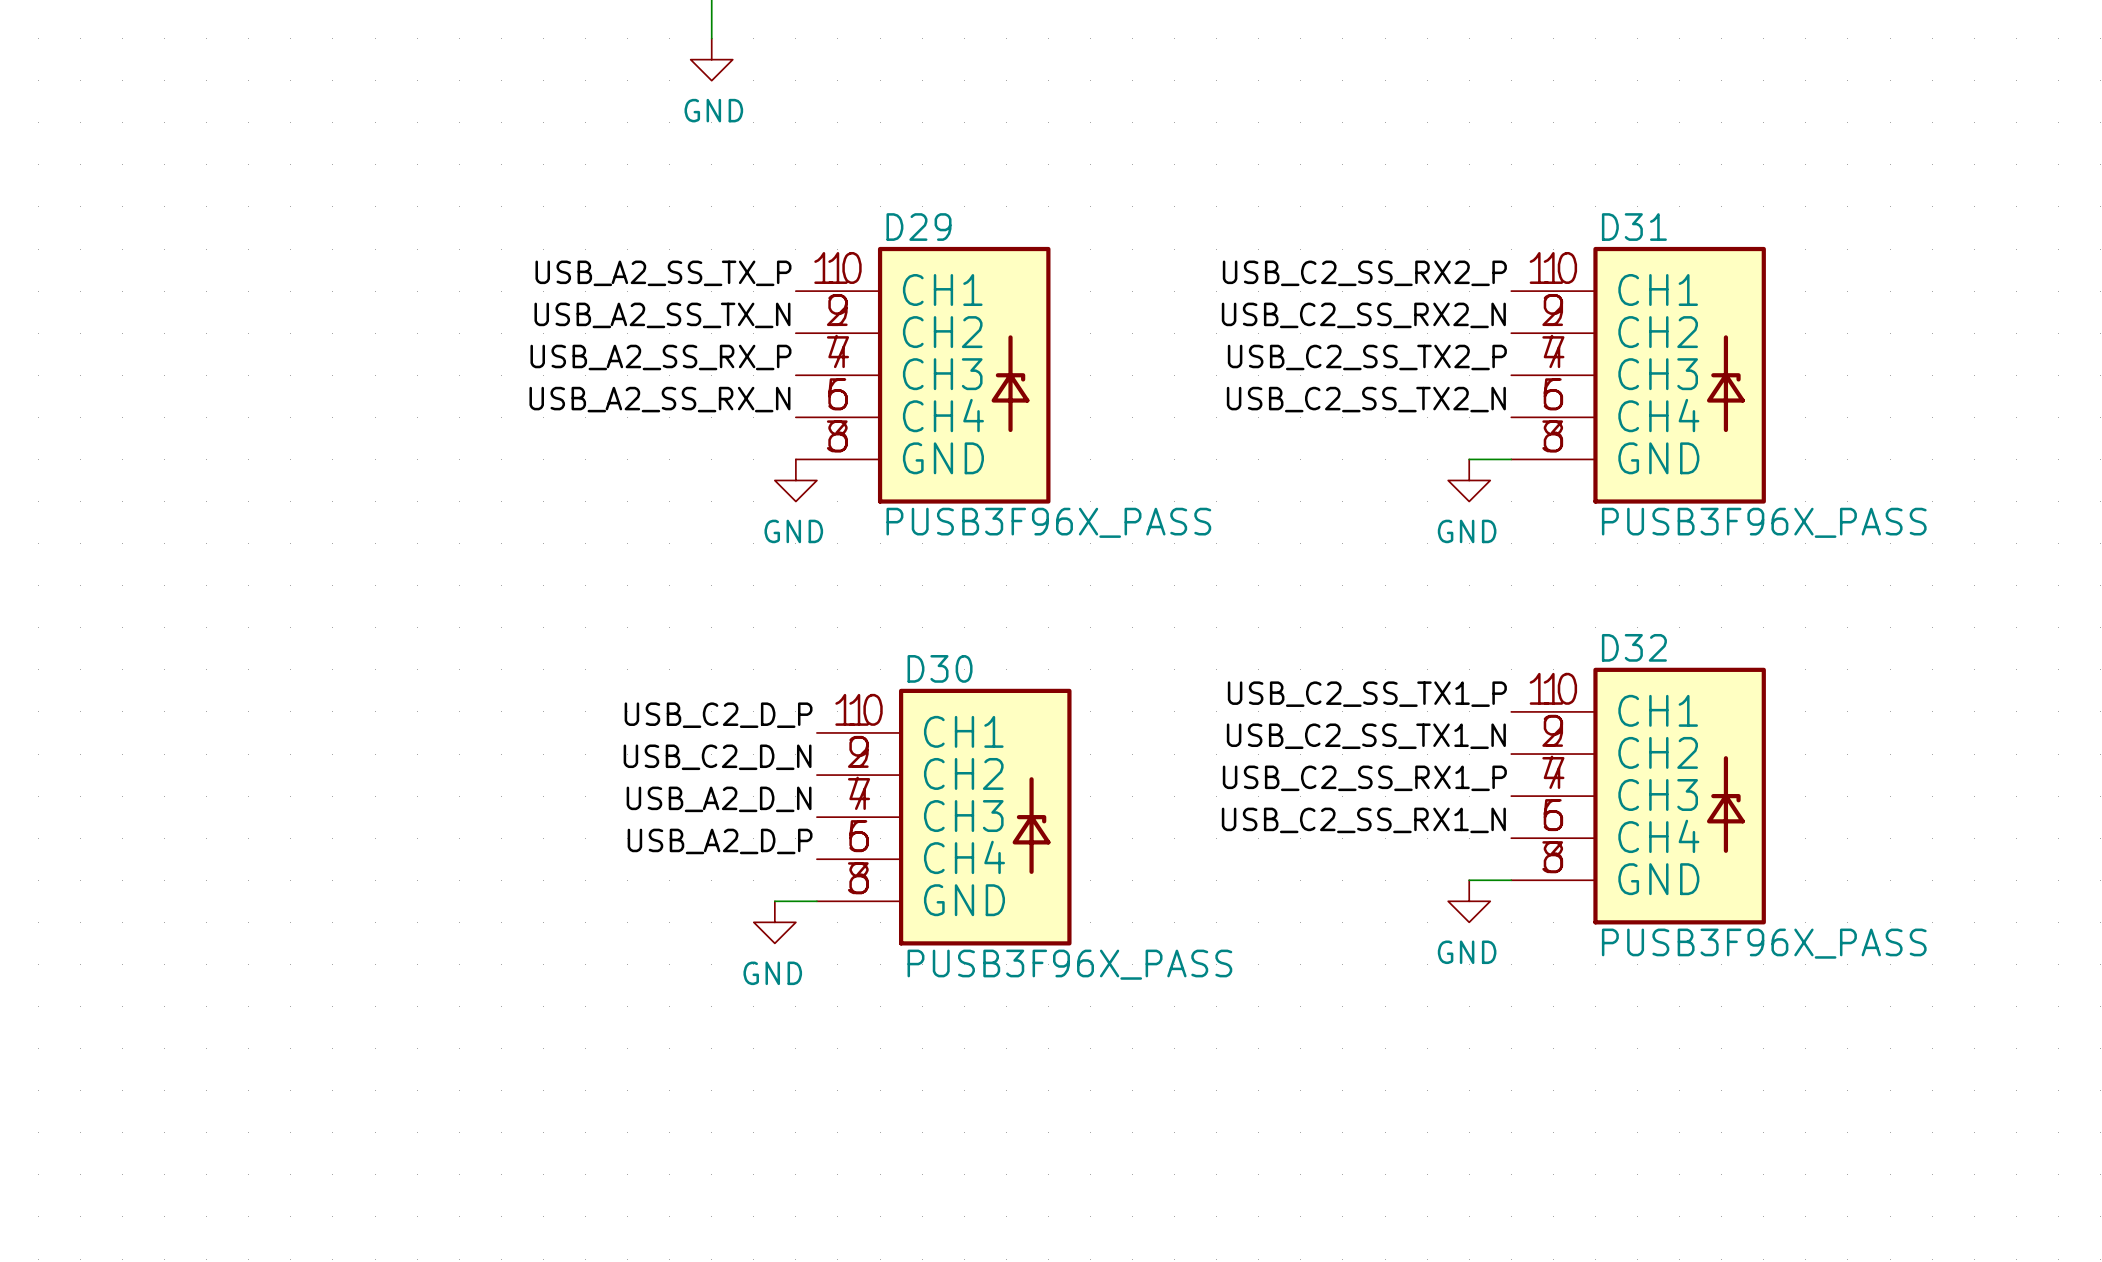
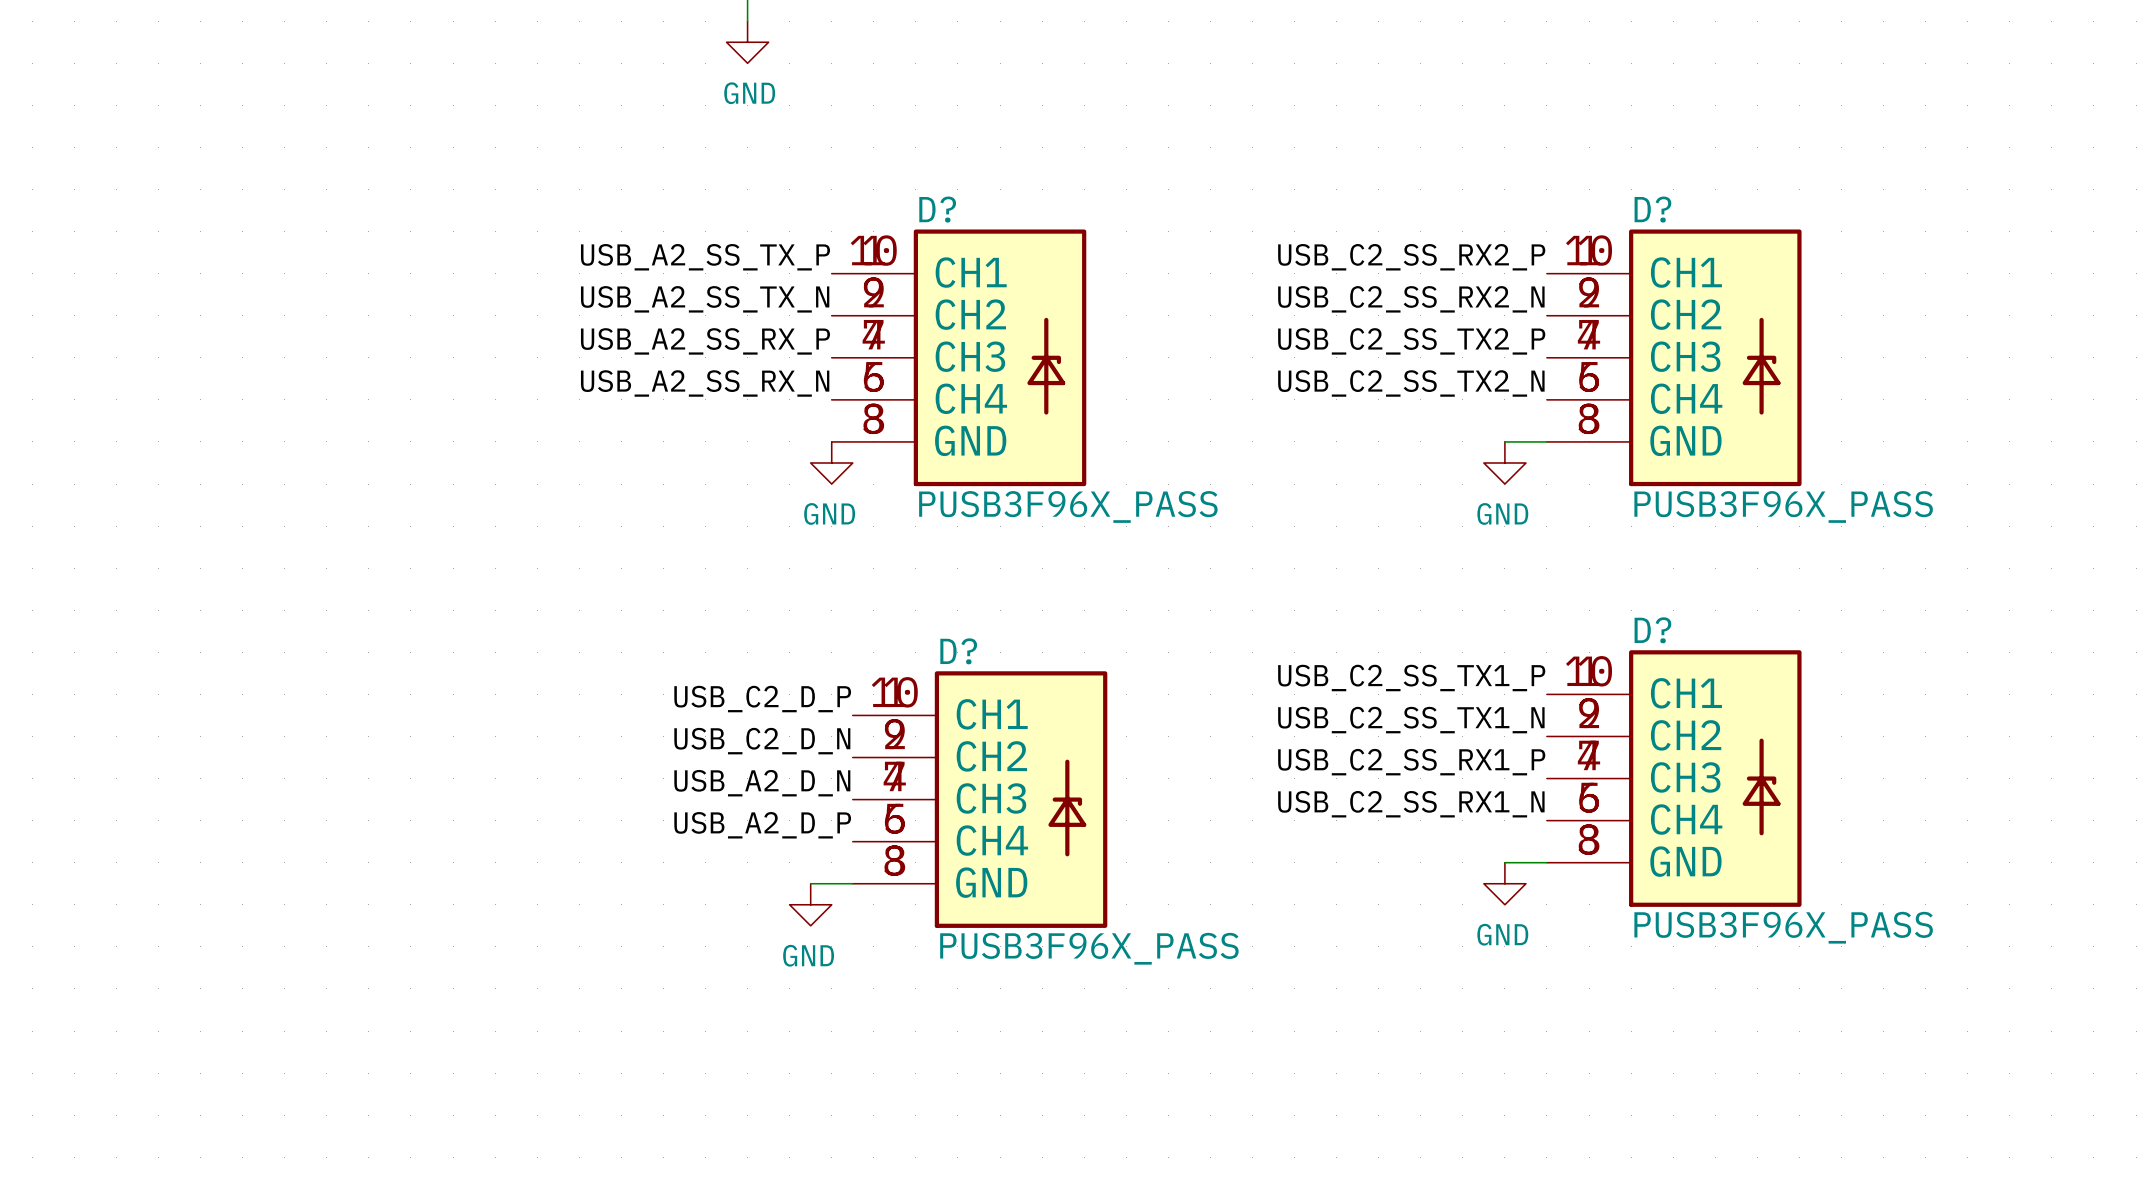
D29 name: D29 (918, 227) -> D? (937, 209)
D31 name: D31 (1634, 227) -> D? (1652, 209)
D32 name: D32 (1634, 647) -> D? (1652, 630)
D30 name: D30 (940, 668) -> D? (958, 651)

